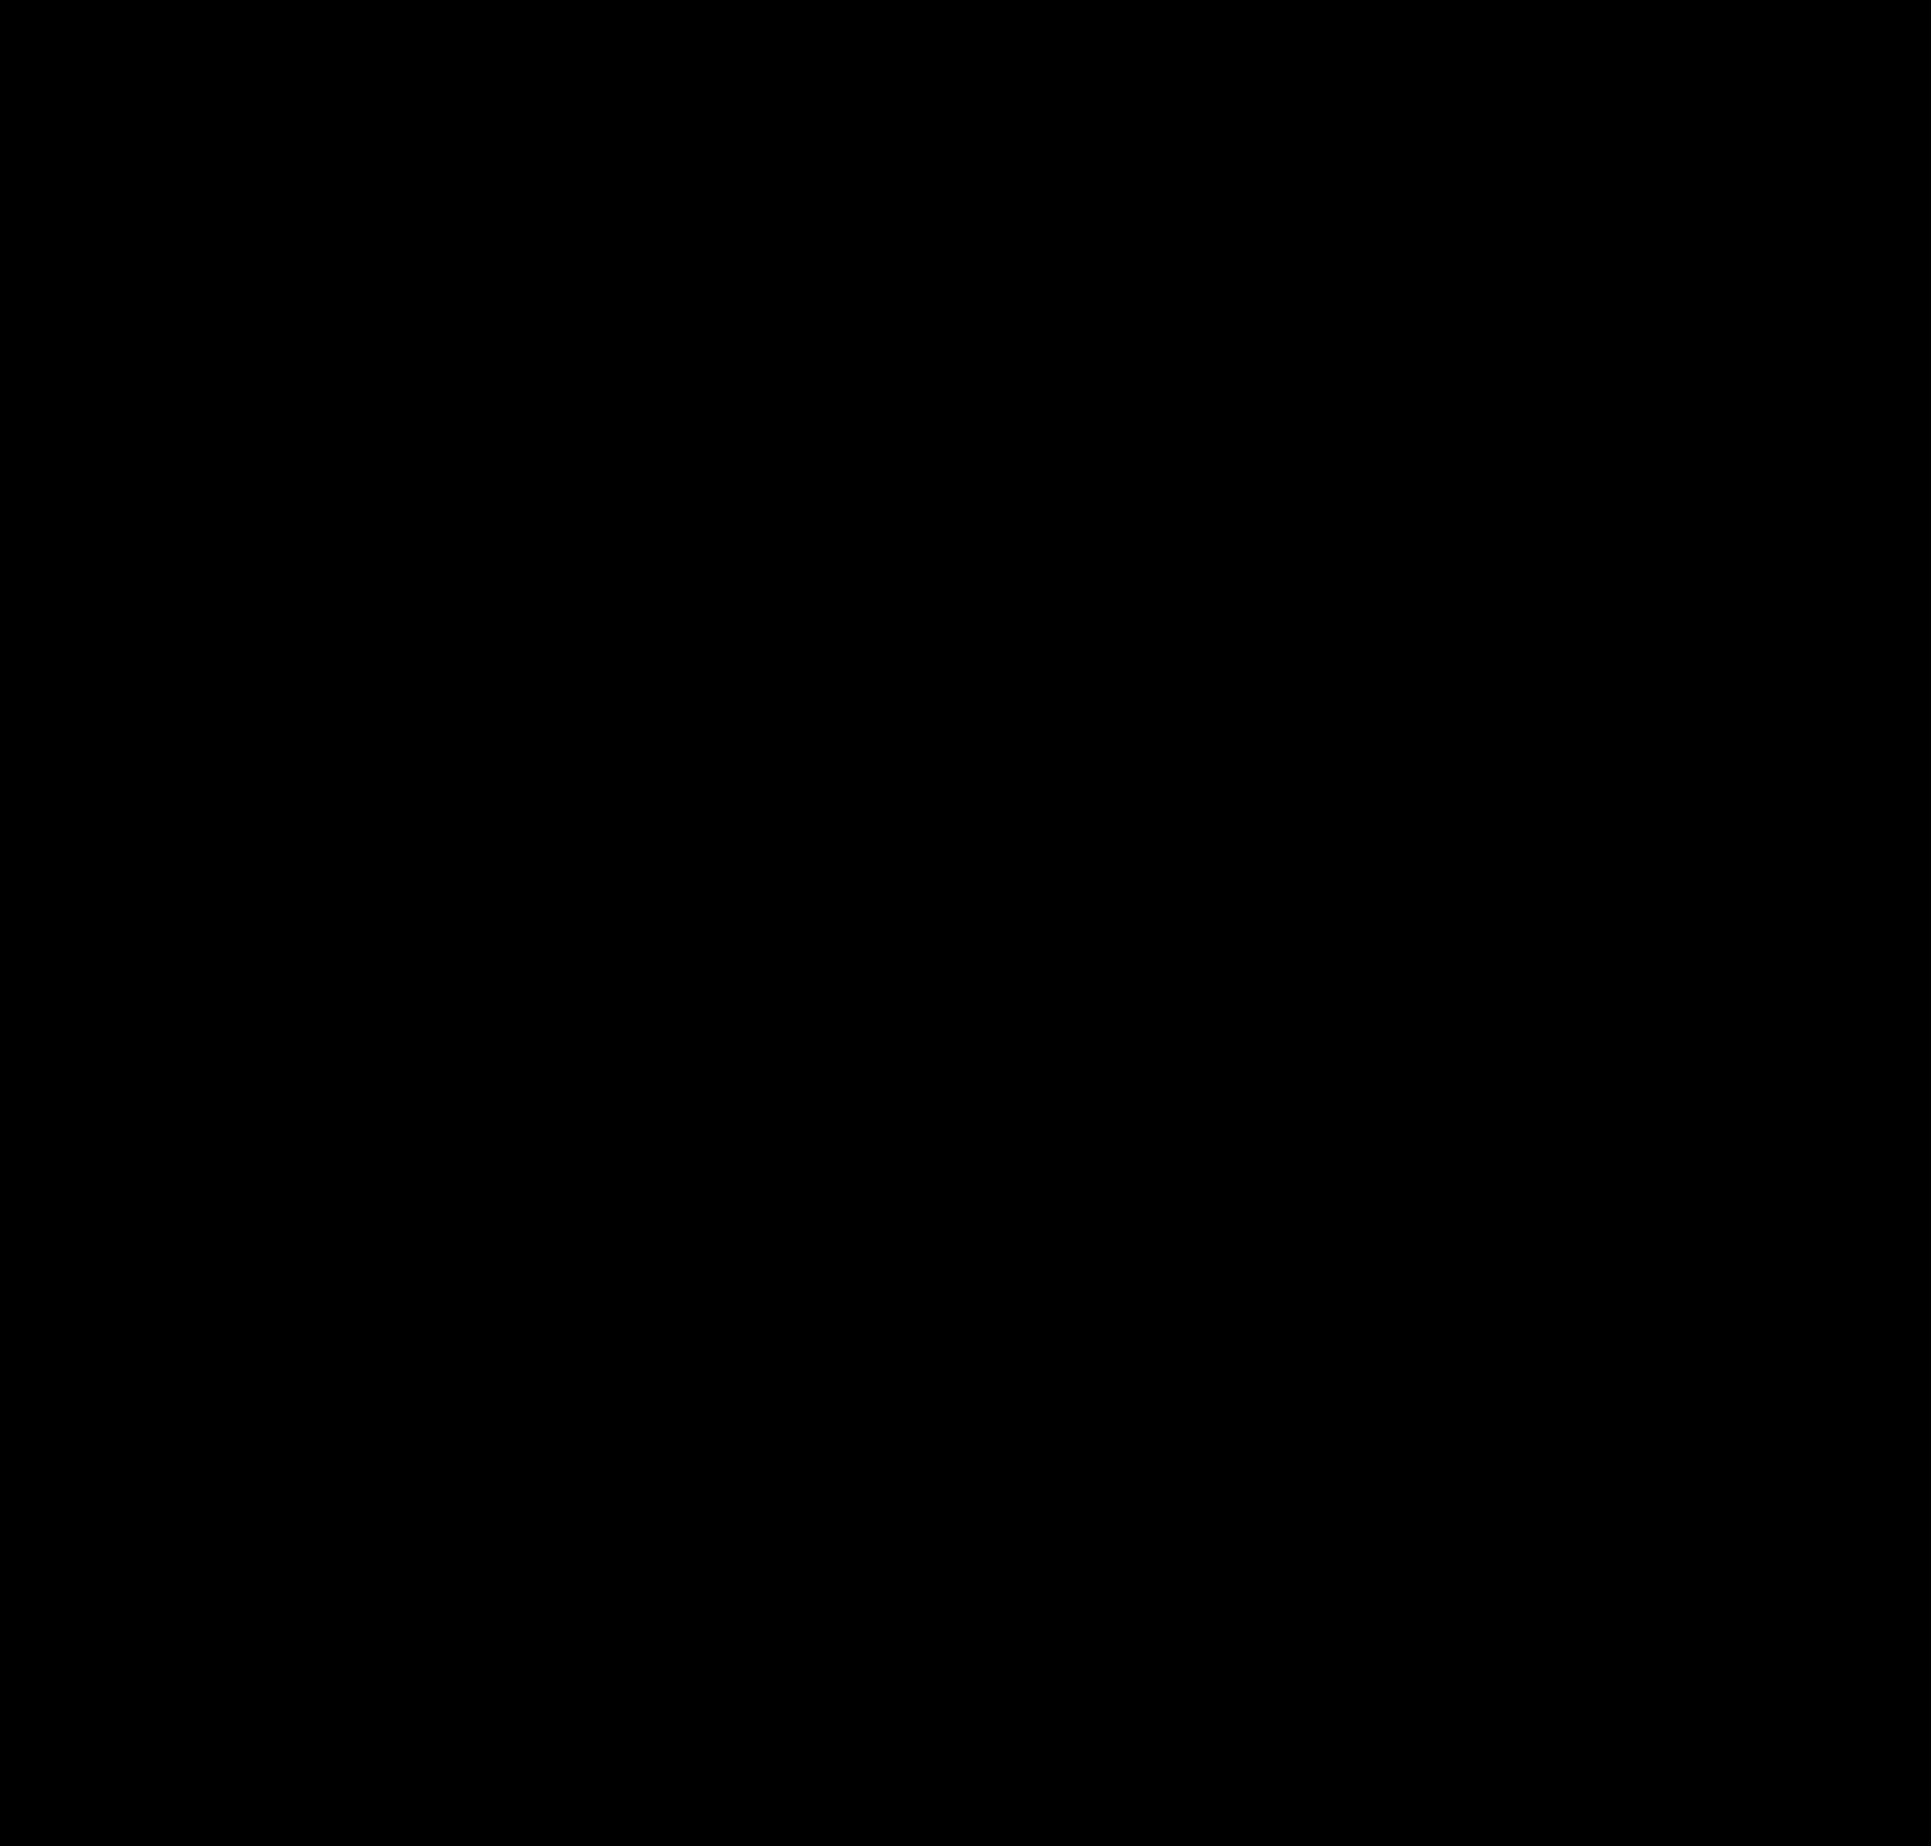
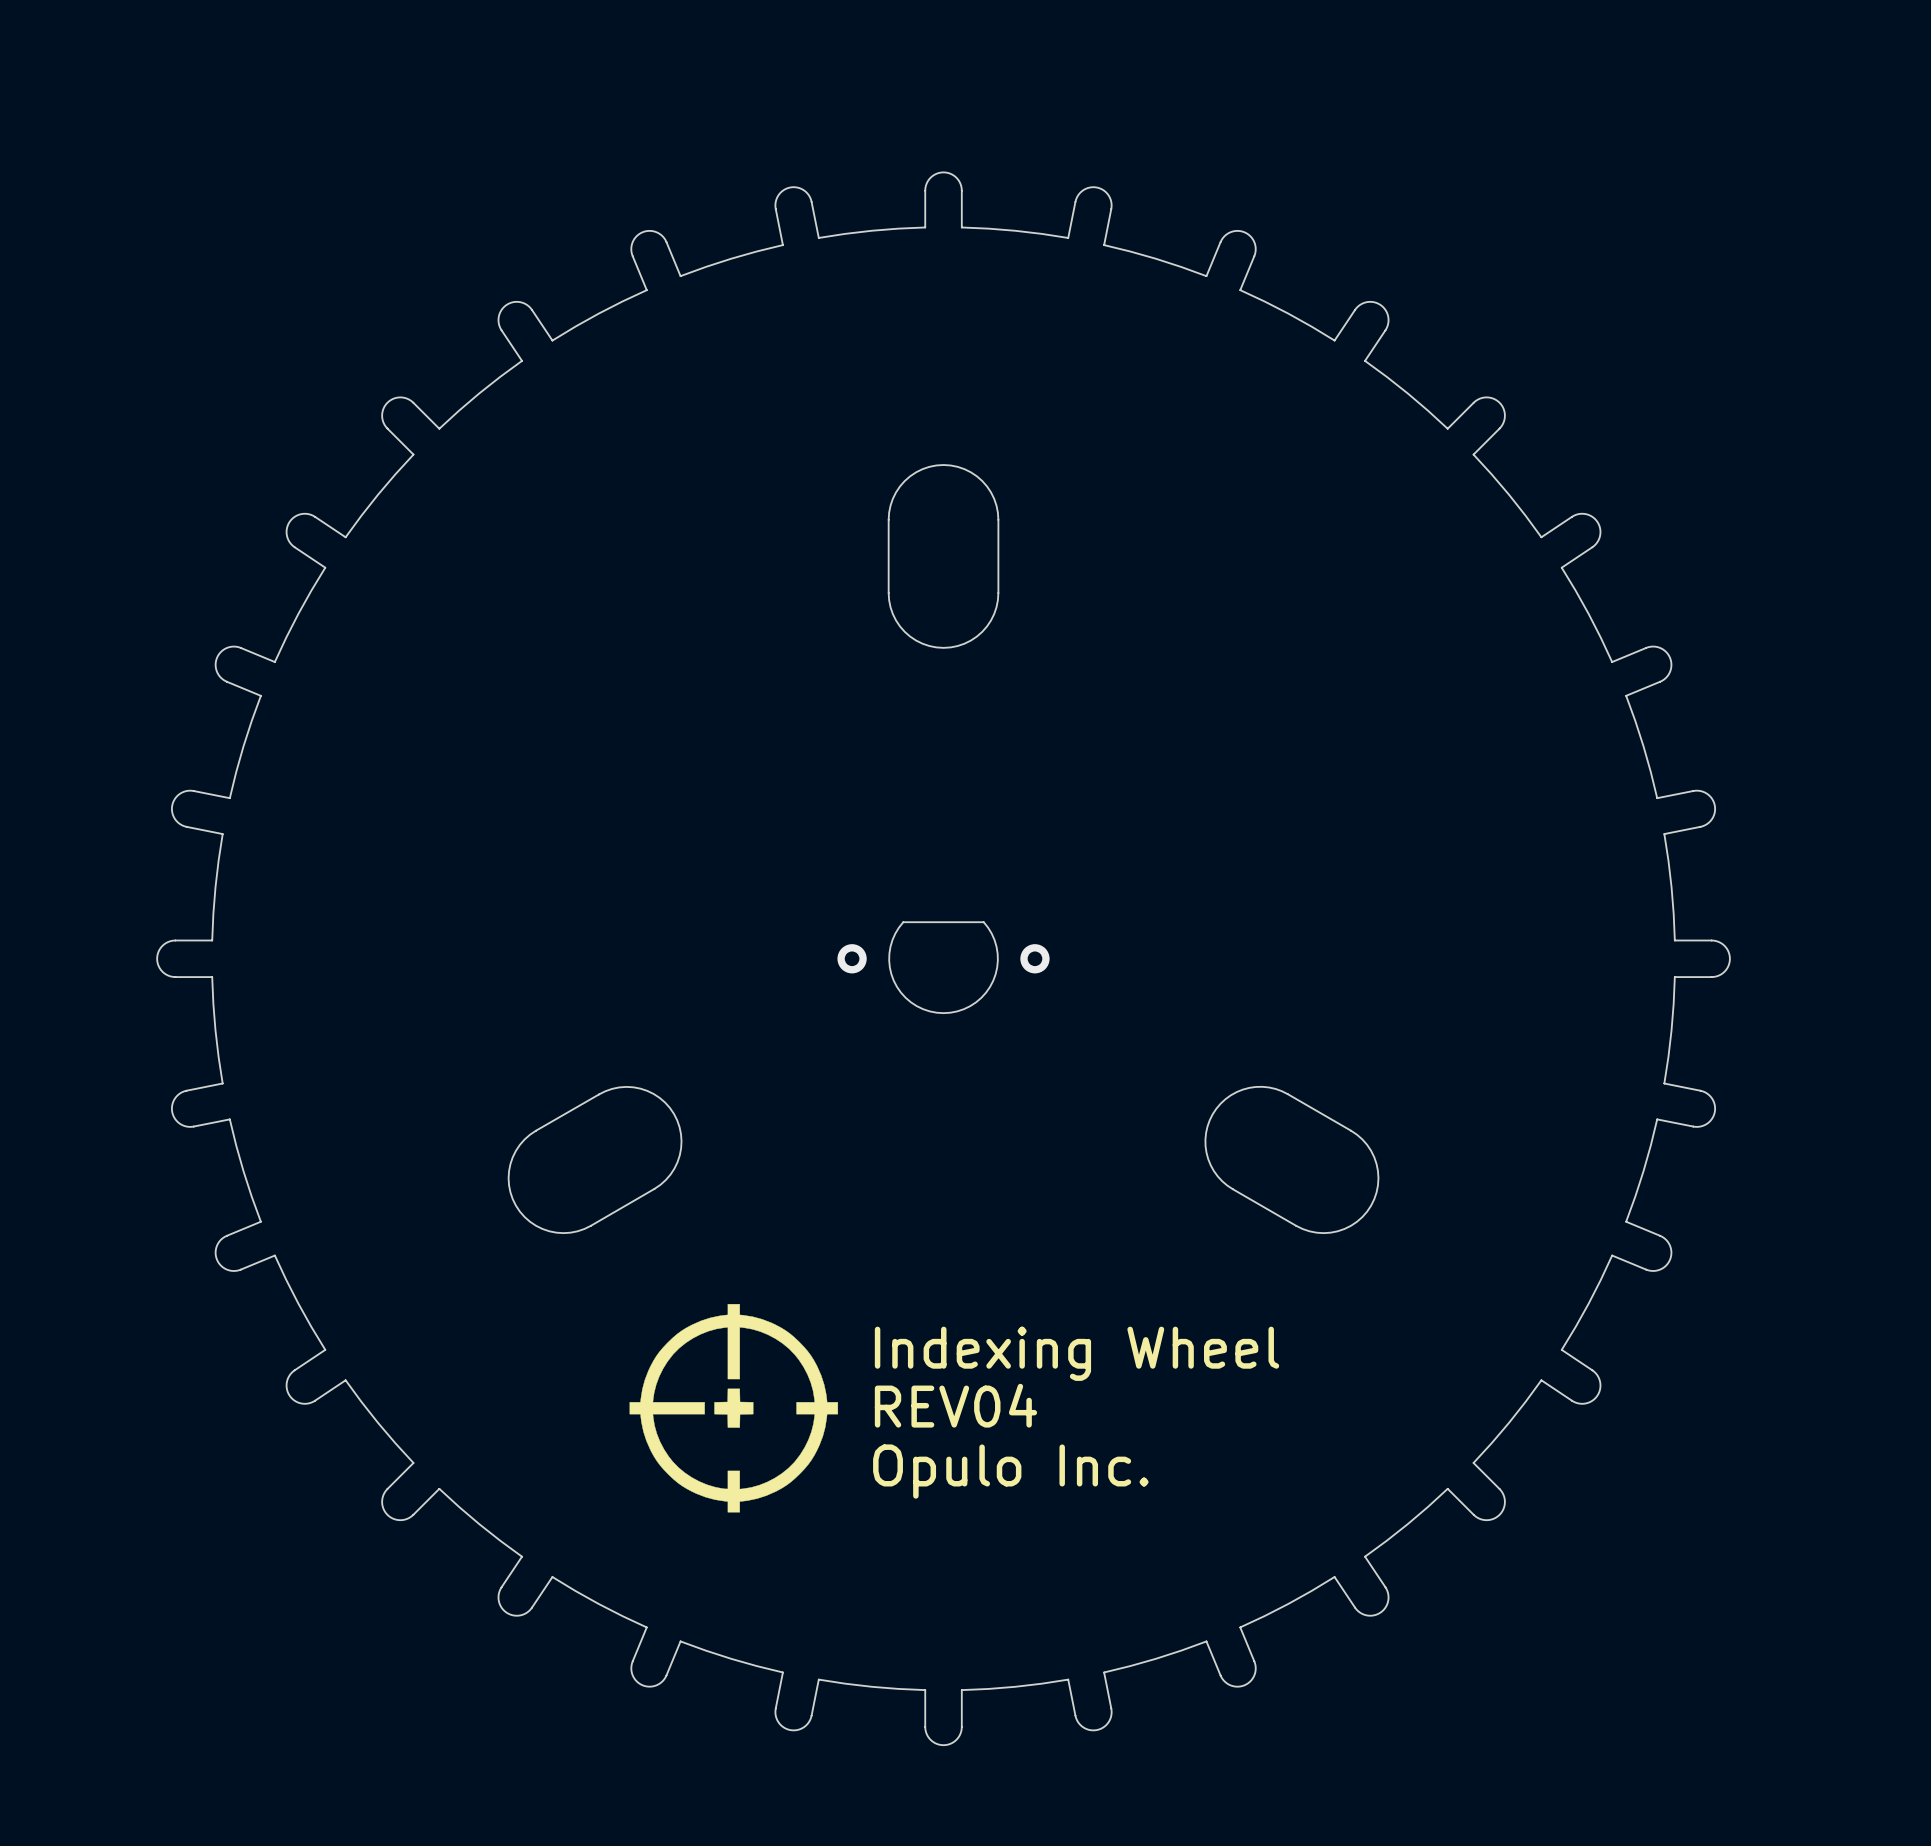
board edge: none -> (387, 428) (413, 454) (378, 494) (345, 537) (308, 514) (296, 515) (288, 523) (286, 535) (291, 544) (325, 567) (298, 613) (274, 662) (234, 646) (223, 649) (217, 657) (216, 668) (221, 678) (260, 695) (243, 746) (229, 798) (188, 790) (178, 795) (172, 805) (173, 817) (182, 825) (222, 834) (215, 887) (212, 940) (170, 941) (160, 947) (157, 958) (160, 969) (170, 976) (212, 977) (215, 1030) (222, 1083) (182, 1092) (173, 1100) (172, 1112) (178, 1122) (189, 1126) (229, 1119) (243, 1171) (260, 1221) (222, 1238) (216, 1248) (217, 1259) (224, 1268) (236, 1270) (274, 1255) (298, 1303) (325, 1349) (291, 1373) (286, 1383) (288, 1393) (298, 1402) (308, 1403) (345, 1380) (378, 1422) (413, 1462) (384, 1492) (382, 1501) (384, 1511) (389, 1516) (398, 1520) (405, 1519) (413, 1514)
board edge: none -> (387, 428) (383, 422) (382, 413) (384, 406) (391, 399) (400, 397) (409, 399) (439, 428) (479, 393) (522, 360) (498, 323) (500, 312) (508, 303) (520, 302) (528, 306) (552, 340) (598, 313) (646, 290) (631, 249) (634, 239) (642, 232) (653, 231) (662, 236) (680, 276) (731, 258) (782, 245) (775, 202) (780, 192) (790, 187) (800, 188) (809, 195) (818, 237) (871, 230) (925, 227) (926, 184) (933, 175) (943, 172) (953, 175) (960, 184) (961, 227) (1015, 230) (1068, 237) (1076, 197) (1085, 189) (1096, 187) (1107, 193) (1111, 204) (1104, 245) (1155, 258) (1206, 276) (1224, 236) (1233, 231) (1244, 232) (1252, 239) (1255, 249) (1240, 290) (1288, 313) (1334, 340) (1358, 306) (1369, 301) (1380, 304) (1387, 314) (1387, 326) (1365, 360) (1407, 393) (1447, 428) (1477, 399) (1489, 397) (1499, 402) (1504, 413) (1502, 424) (1473, 454) (1508, 494) (1541, 537) (1578, 514) (1588, 515) (1597, 521) (1600, 532) (1597, 542) (1561, 567) (1588, 613) (1612, 662) (1652, 646) (1663, 649) (1670, 657) (1671, 668) (1665, 678) (1626, 695) (1643, 746) (1657, 798) (1698, 790) (1708, 795) (1714, 805) (1713, 816) (1704, 825) (1664, 834) (1671, 887) (1674, 940) (1716, 941) (1726, 947) (1729, 958) (1726, 969) (1716, 976) (1674, 977) (1671, 1030) (1664, 1083) (1704, 1092) (1713, 1100) (1714, 1112) (1708, 1122) (1698, 1126) (1657, 1119) (1643, 1171) (1626, 1221) (1664, 1238) (1670, 1247) (1670, 1259) (1662, 1268) (1650, 1270) (1612, 1255) (1588, 1303) (1561, 1349) (1597, 1374) (1600, 1385) (1597, 1395) (1588, 1402) (1578, 1403) (1541, 1380) (1509, 1422) (1473, 1462) (1502, 1492) (1504, 1504) (1499, 1514) (1489, 1520) (1477, 1517) (1447, 1488) (1407, 1524) (1365, 1556) (1387, 1591) (1387, 1603) (1380, 1612) (1369, 1615) (1358, 1611) (1334, 1577) (1288, 1603) (1240, 1627) (1255, 1667) (1252, 1678) (1244, 1685) (1233, 1686) (1224, 1680) (1206, 1641) (1155, 1658) (1104, 1672) (1111, 1715) (1106, 1724) (1096, 1730) (1086, 1728) (1077, 1721) (1068, 1679) (1015, 1686) (961, 1690) (960, 1733) (953, 1741) (943, 1745) (933, 1741) (926, 1733) (925, 1690) (871, 1686) (818, 1679) (810, 1720) (801, 1728) (790, 1730) (779, 1724) (775, 1713) (782, 1672) (731, 1658) (680, 1641) (664, 1679) (654, 1686) (642, 1685) (633, 1677) (631, 1666) (646, 1627) (598, 1603) (552, 1577) (529, 1610) (519, 1615) (508, 1613) (500, 1606) (498, 1593) (522, 1556) (479, 1524) (439, 1488) (413, 1514)
board edge: none -> (888, 519) (889, 600) (892, 614) (900, 626) (916, 640) (936, 647) (957, 646) (976, 636) (991, 620) (997, 600) (997, 512) (994, 498) (987, 486) (976, 476) (957, 466) (936, 465) (922, 469) (910, 476) (900, 486) (890, 505) (888, 519)
board edge: none -> (903, 922) (983, 922) (994, 939) (997, 960) (993, 980) (981, 997) (963, 1009) (943, 1013) (923, 1009) (905, 997) (893, 980) (889, 960) (892, 939) (903, 922)
via: none -> (852, 958)
via: none -> (1034, 958)
board edge: none -> (598, 1094) (530, 1134) (519, 1144) (512, 1157) (508, 1178) (512, 1199) (524, 1217) (542, 1228) (556, 1232) (570, 1232) (590, 1225) (660, 1184) (670, 1174) (677, 1162) (681, 1141) (679, 1127) (669, 1107) (659, 1097) (640, 1088) (626, 1086) (612, 1088) (598, 1094)
board edge: none -> (1287, 1094) (1356, 1134) (1367, 1144) (1374, 1157) (1378, 1178) (1374, 1199) (1362, 1217) (1344, 1228) (1323, 1233) (1302, 1228) (1227, 1185) (1217, 1176) (1210, 1165) (1205, 1146) (1206, 1132) (1209, 1120) (1220, 1103) (1230, 1095) (1249, 1087) (1269, 1087) (1287, 1094)
drawing: none -> [629, 1304, 839, 1513]
text: none -> Indexing Wheel (1077, 1353)
text: none -> REV04 (955, 1405)
text: none -> Opulo Inc. (1010, 1471)

